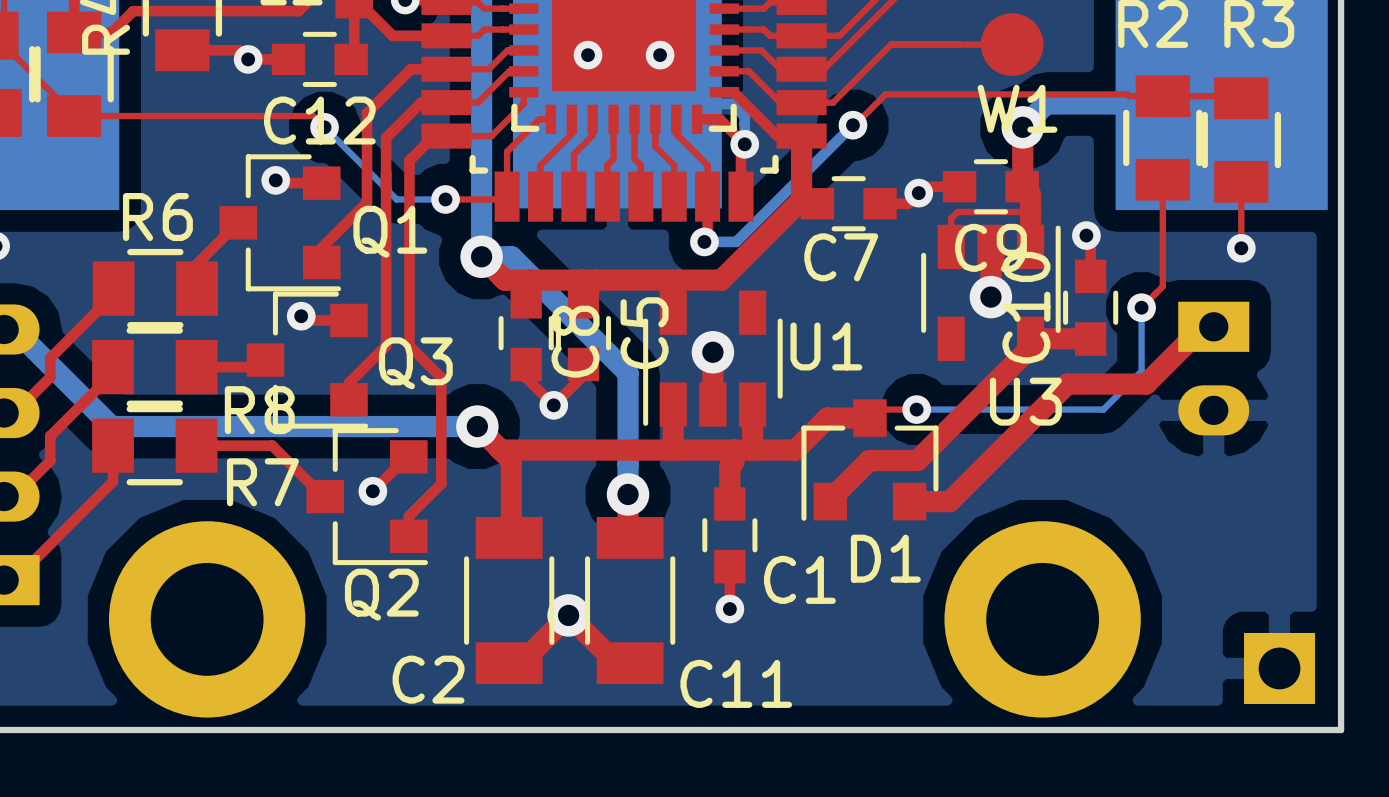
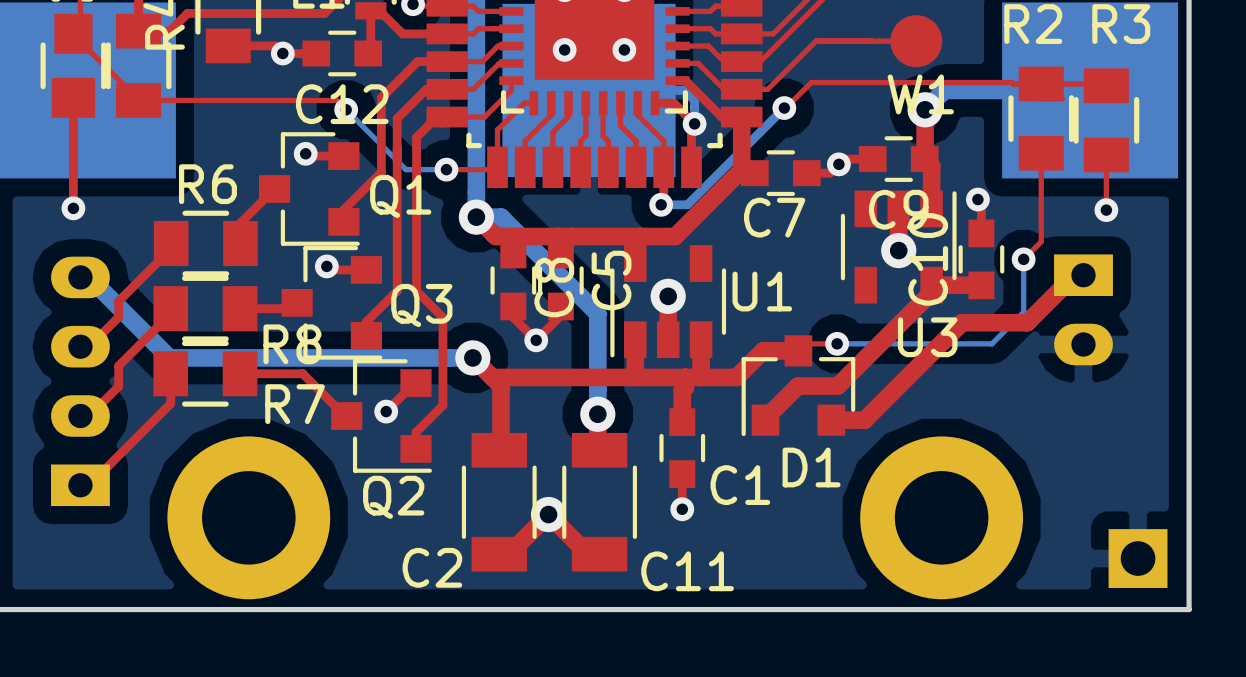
top track: (1030, 210) (1028, 211) (957, 211) (951, 218) (951, 246) -> none

